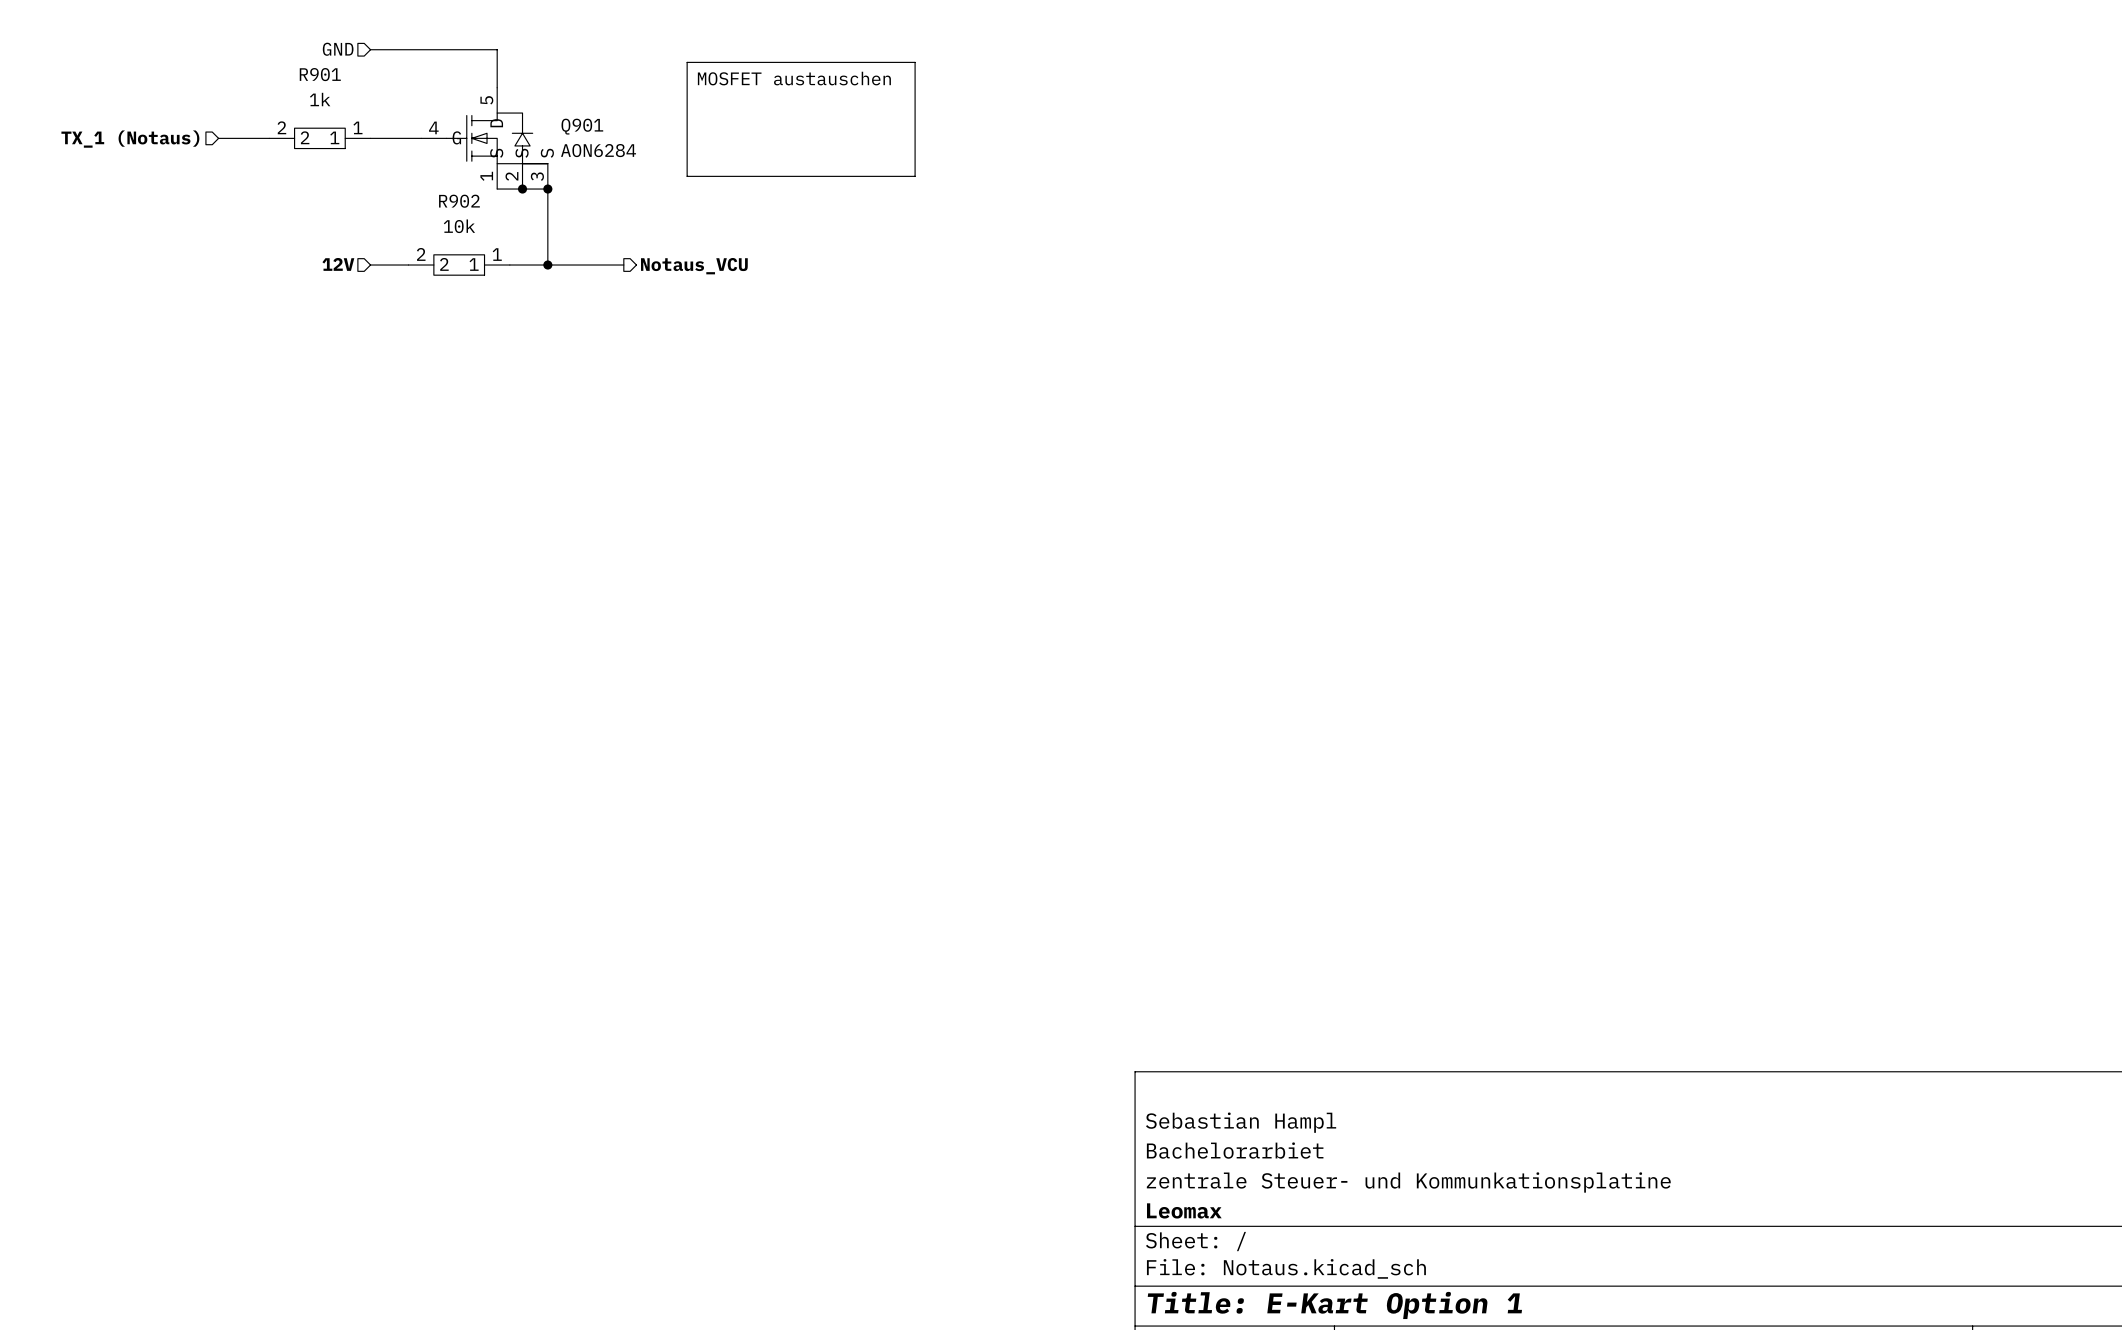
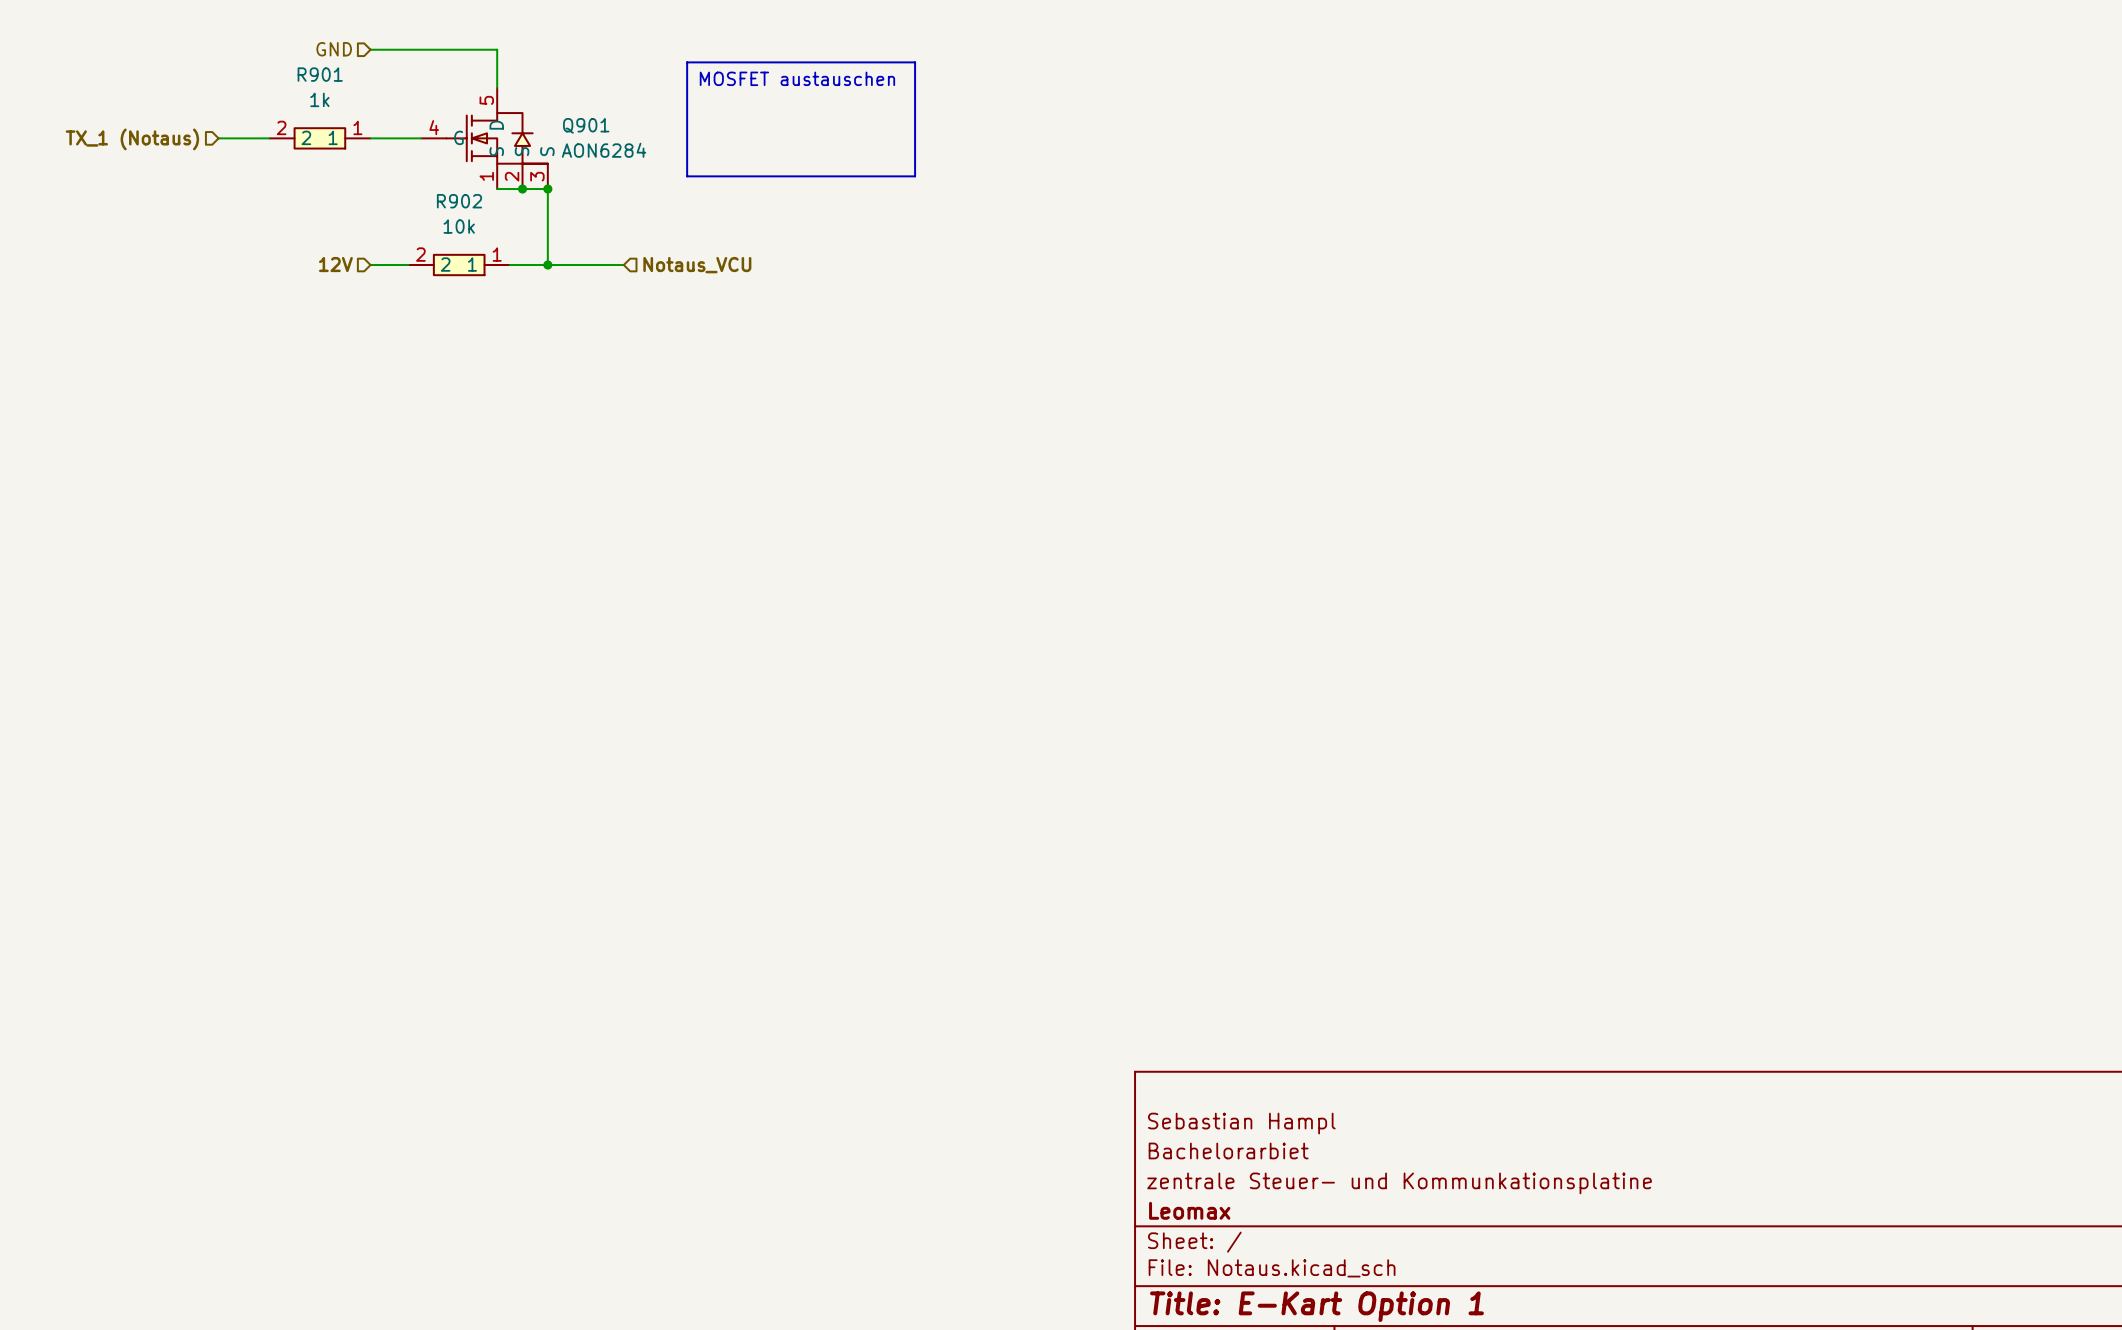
hierarchical label shape: output (694, 266) -> input (697, 265)

